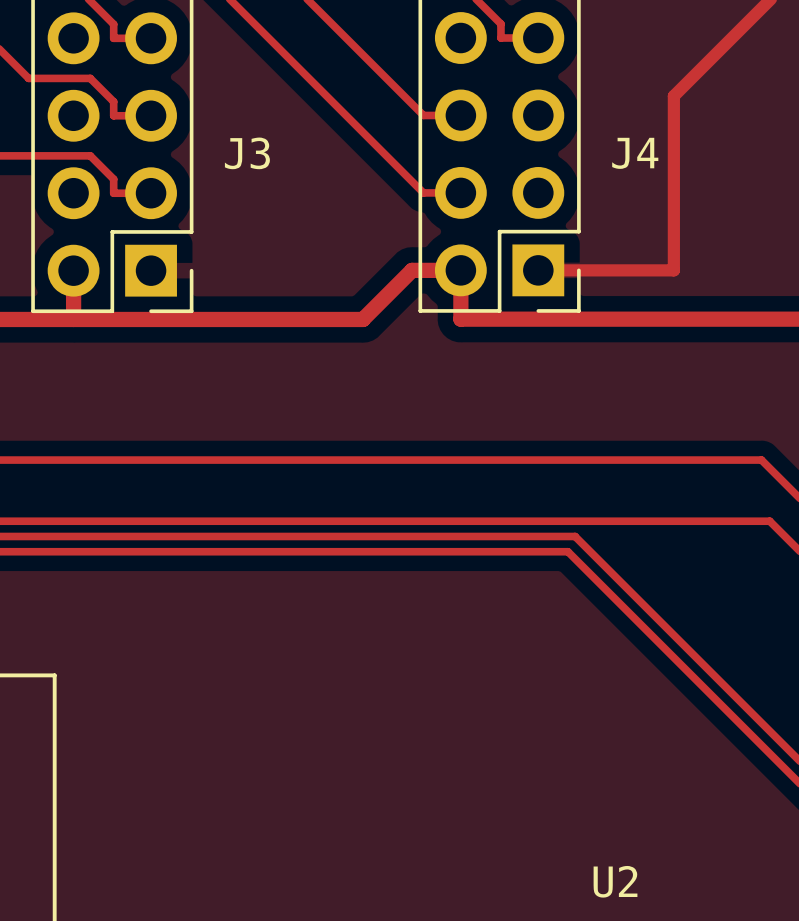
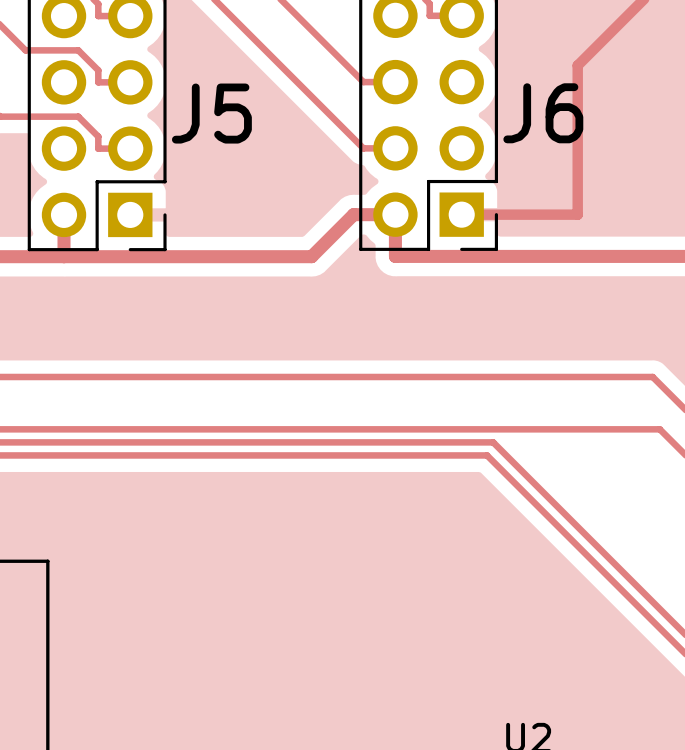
J3 name: J3 (247, 153) -> J5 (211, 113)
J4 name: J4 (635, 153) -> J6 (543, 113)

